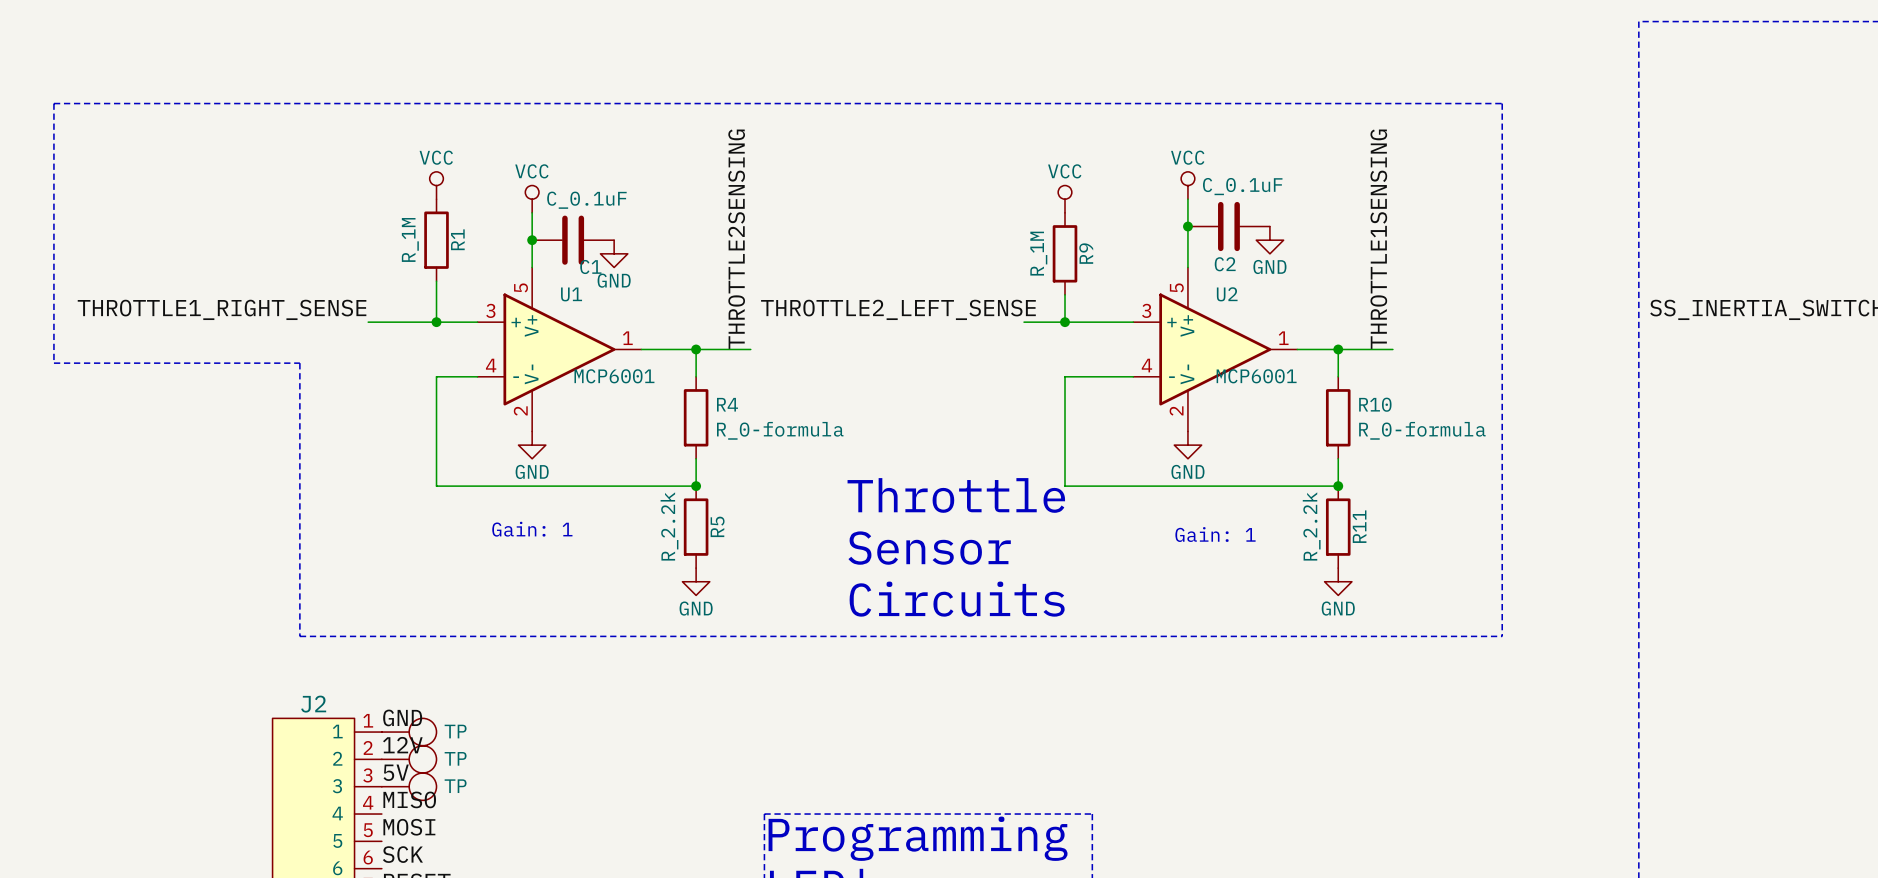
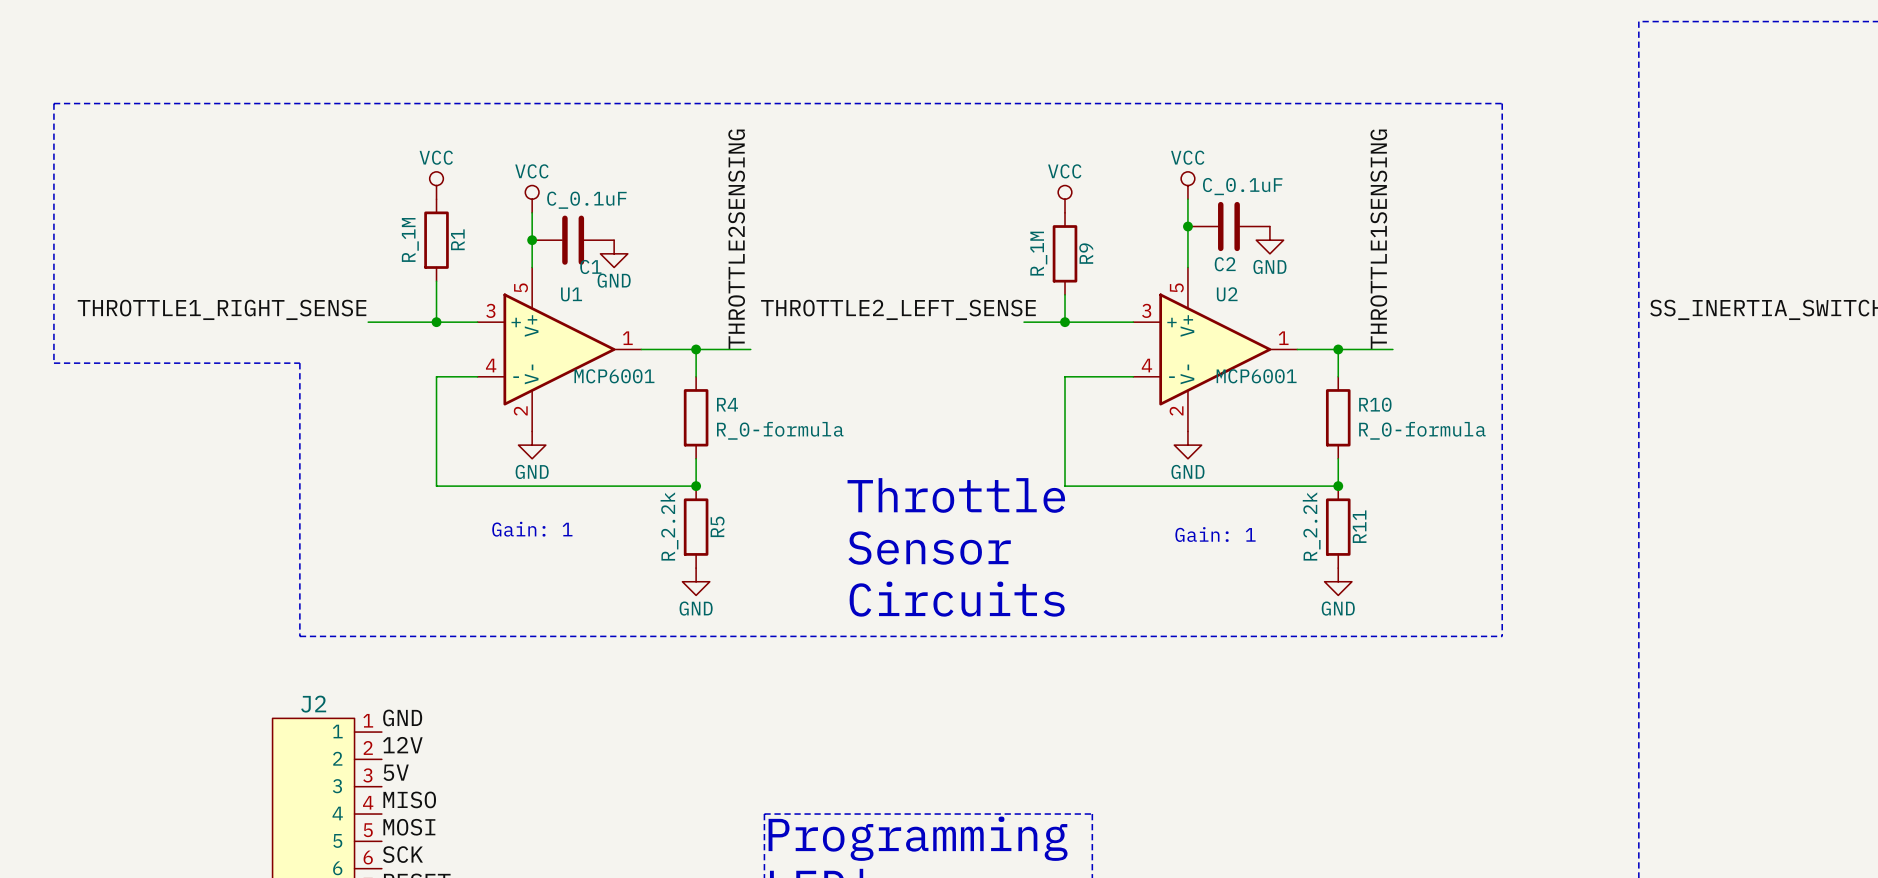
TP: (409, 732) -> none
TP: (409, 759) -> none
TP: (409, 786) -> none

